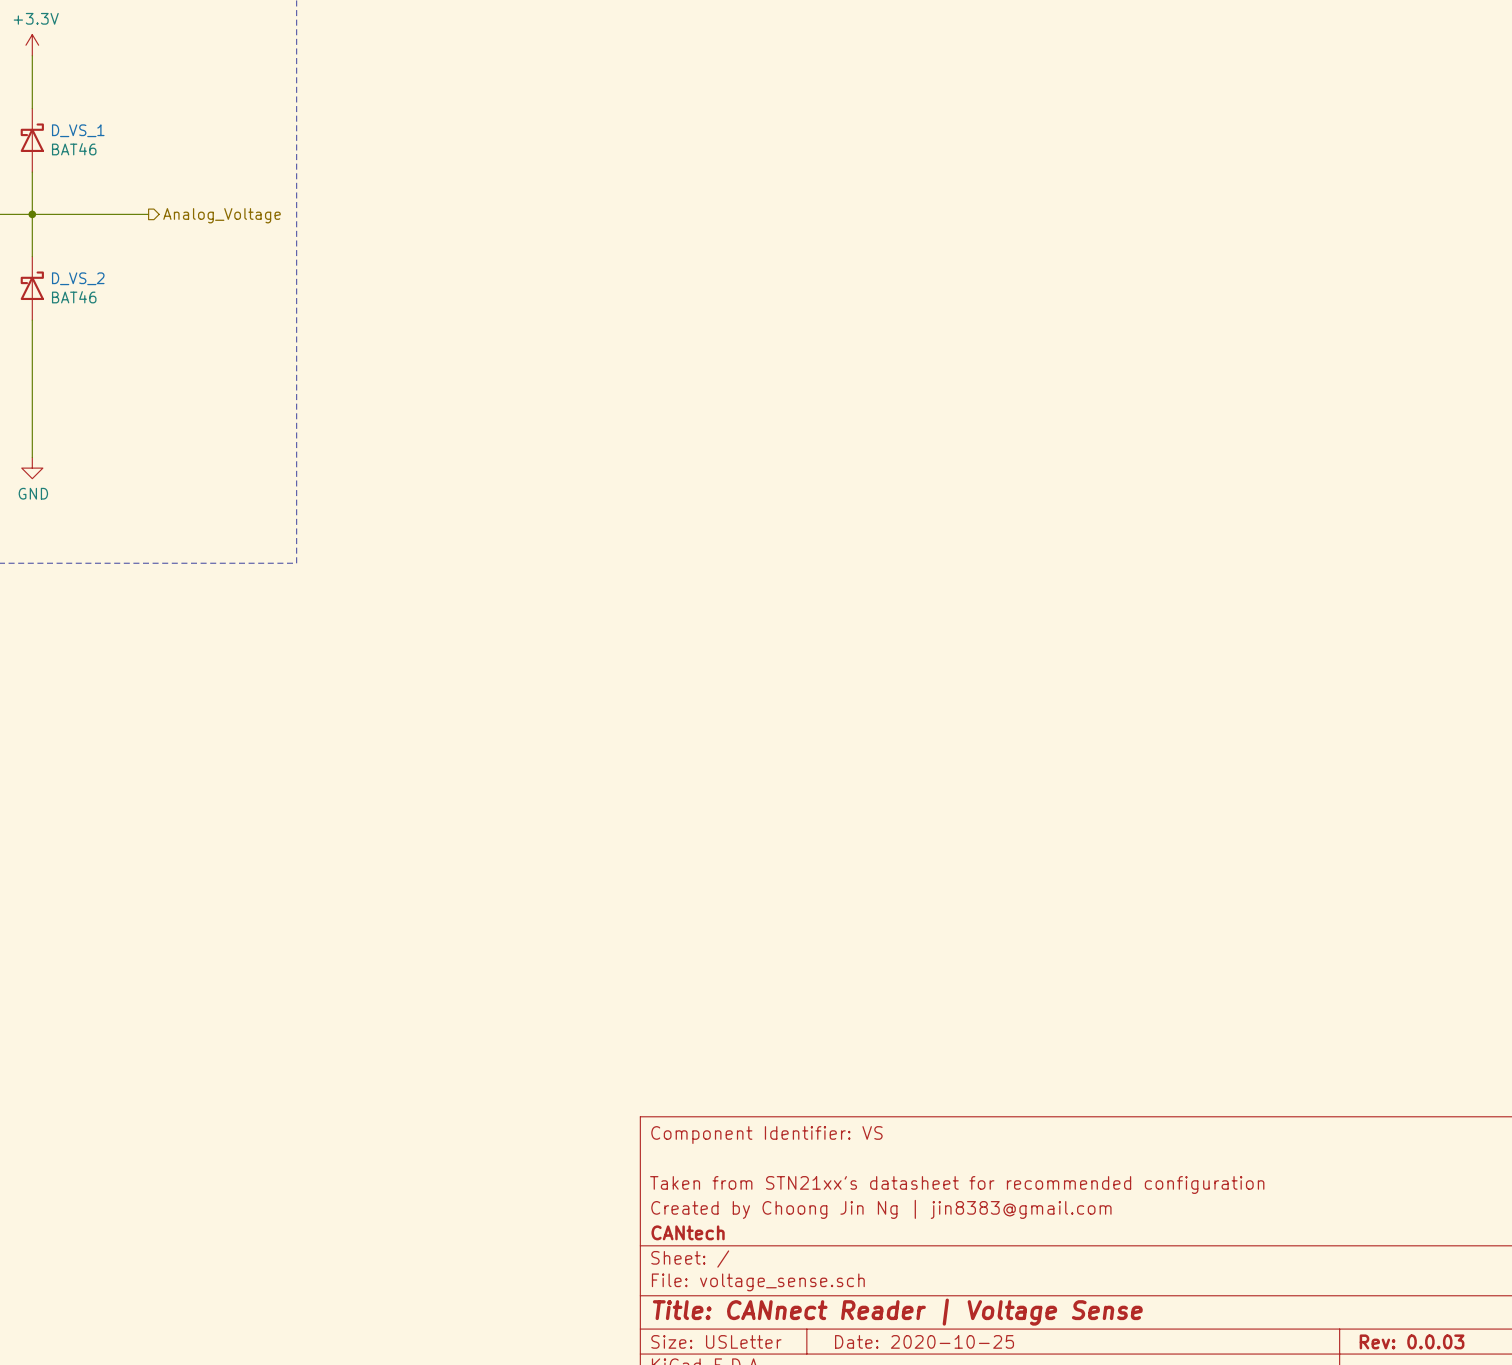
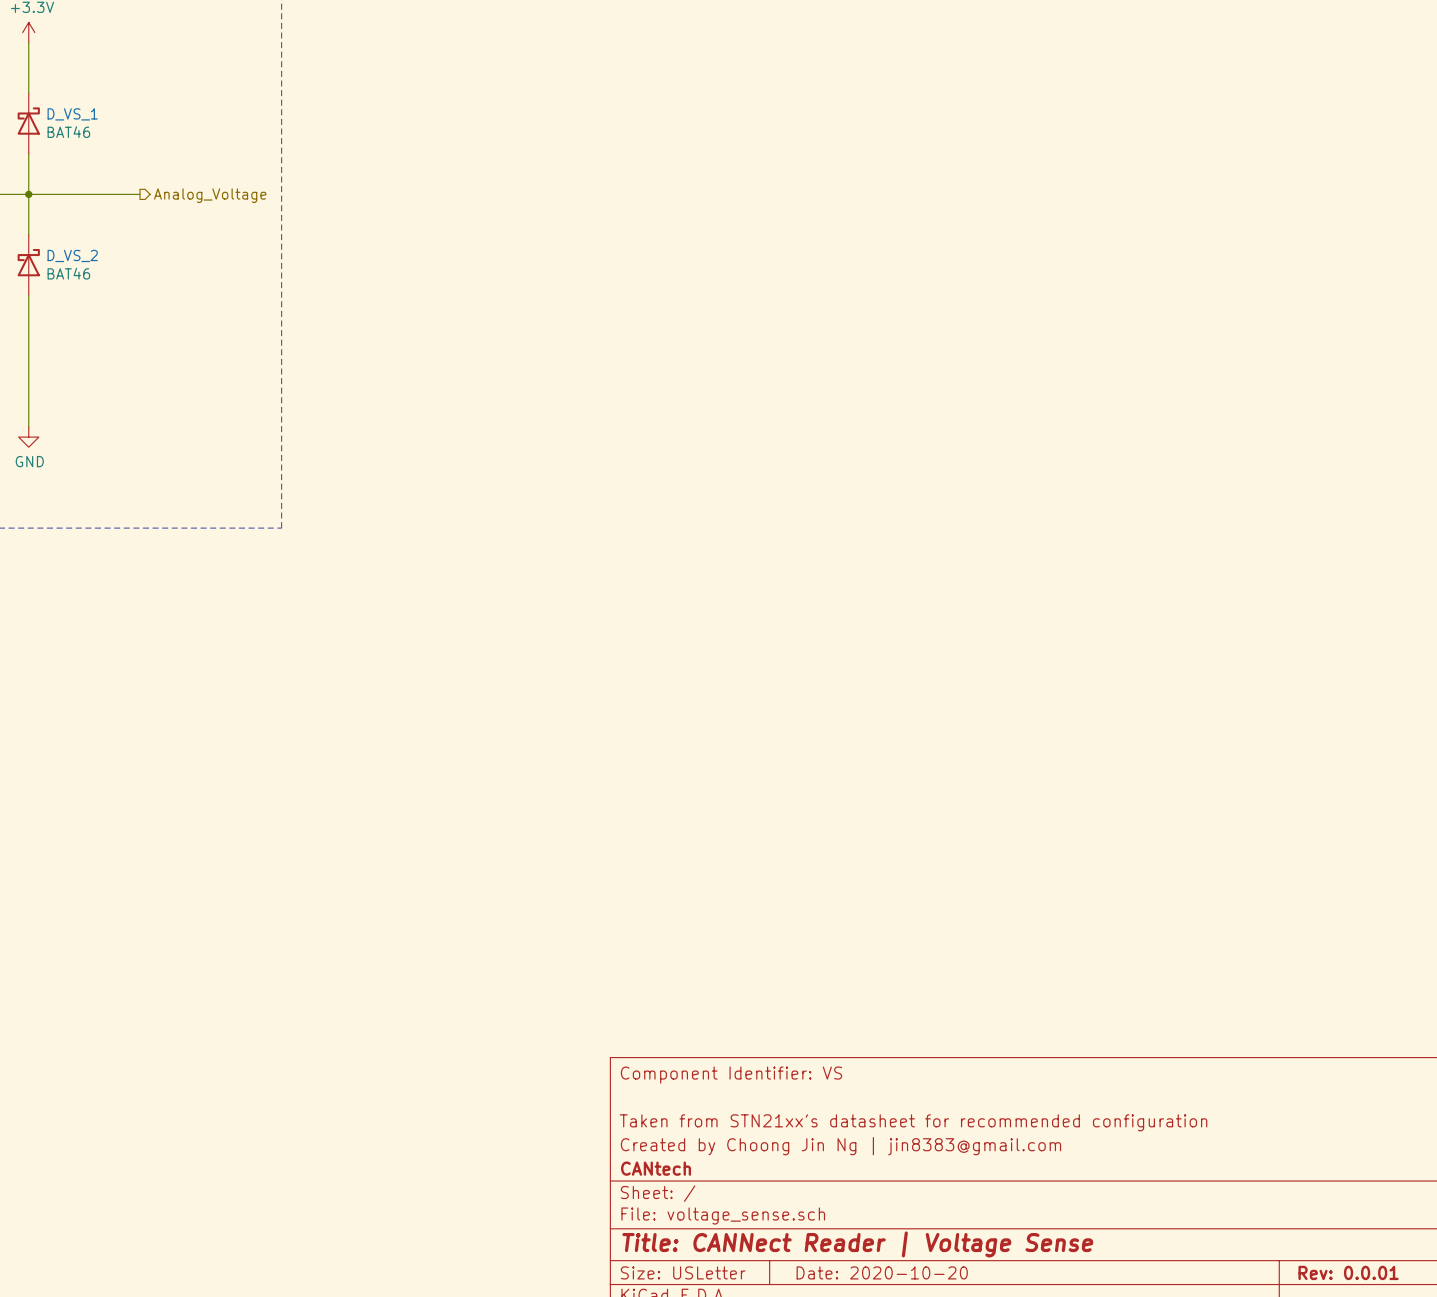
title block: Title: CANnect Reader | Voltage Sense (897, 1312) -> Title: CANNect Reader | Voltage Sense (857, 1244)
title block: Date: 2020-10-25 (924, 1341) -> Date: 2020-10-20 (882, 1272)
title block: Rev: 0.0.03 (1412, 1341) -> Rev: 0.0.01 (1348, 1272)

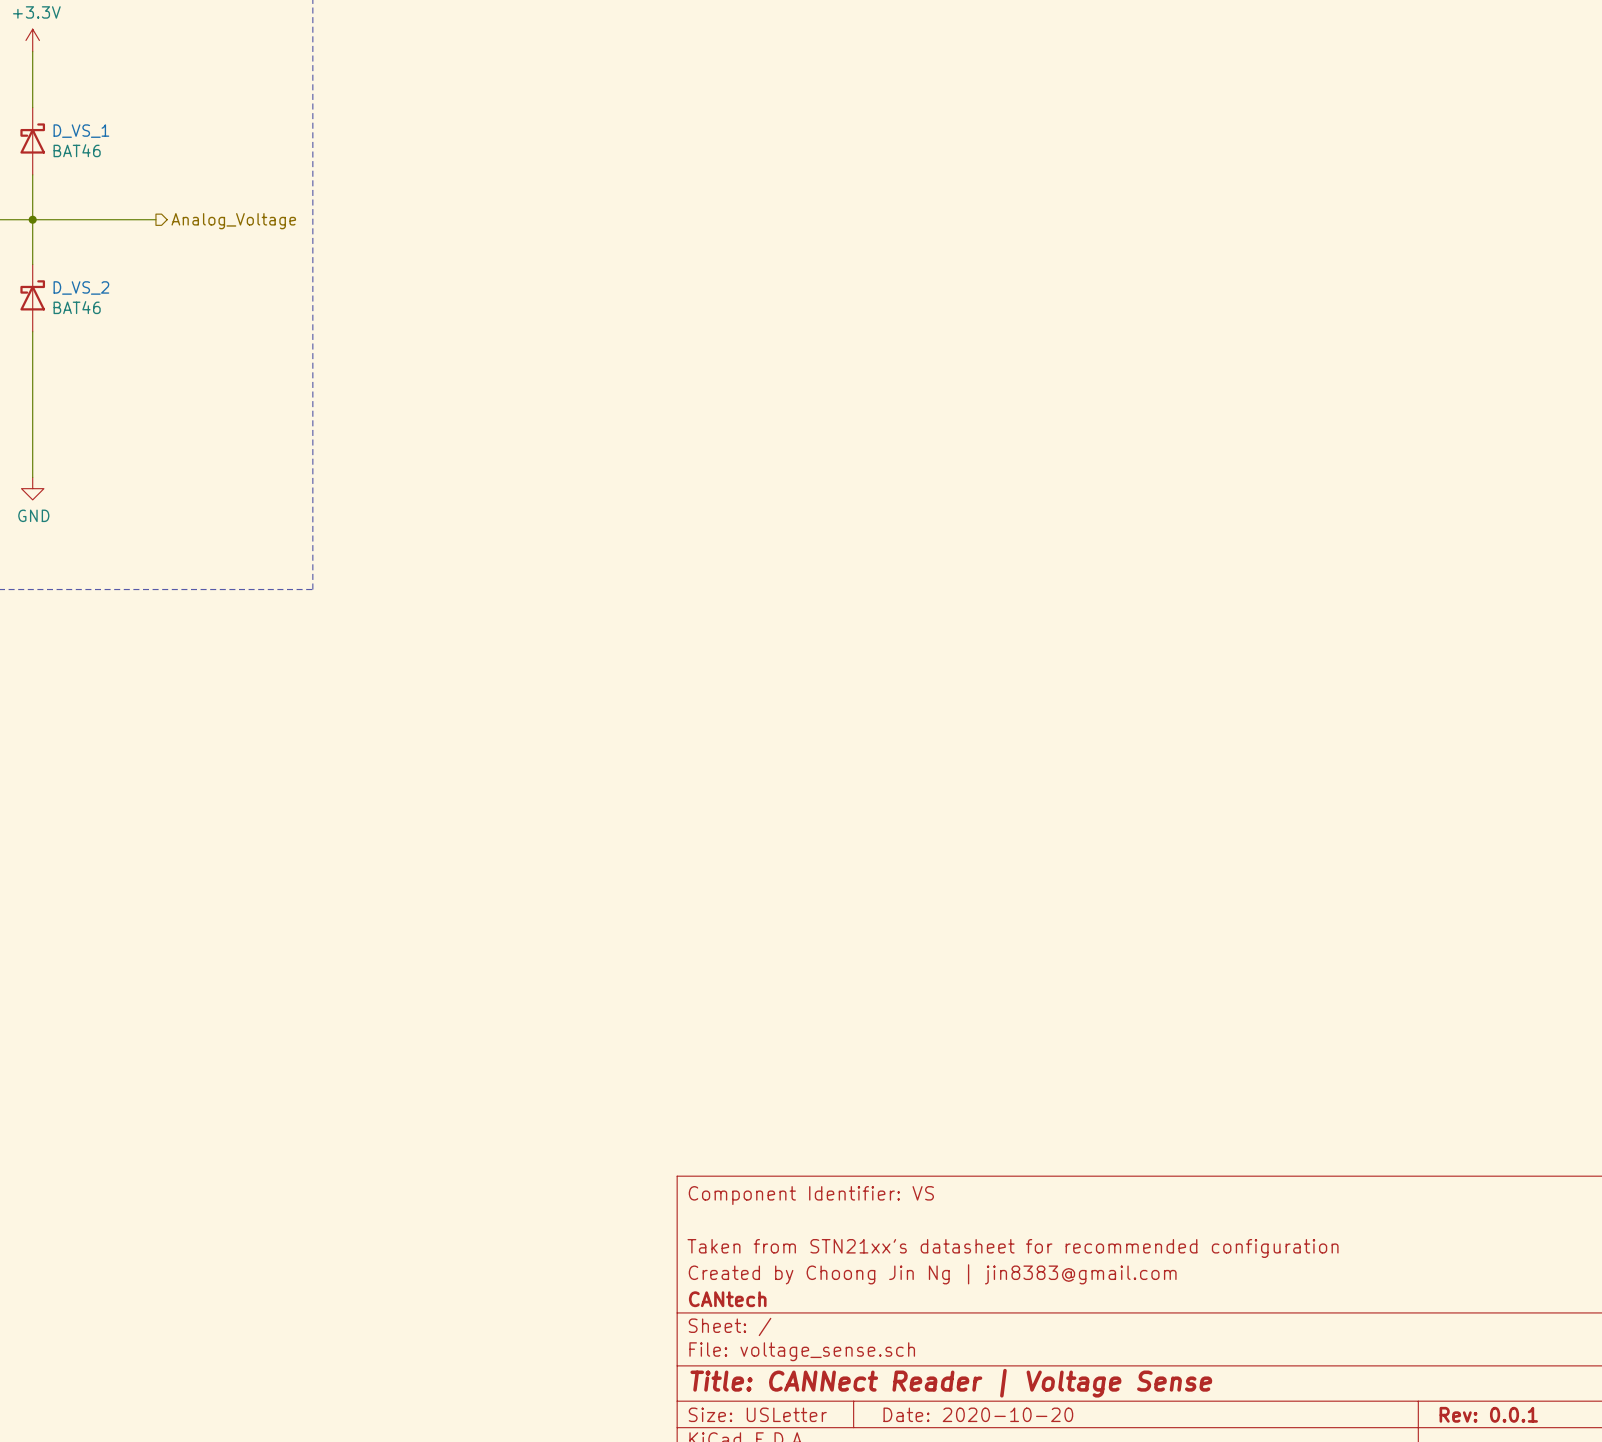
title block: Rev: 0.0.01 (1348, 1272) -> Rev: 0.0.1 (1488, 1414)

